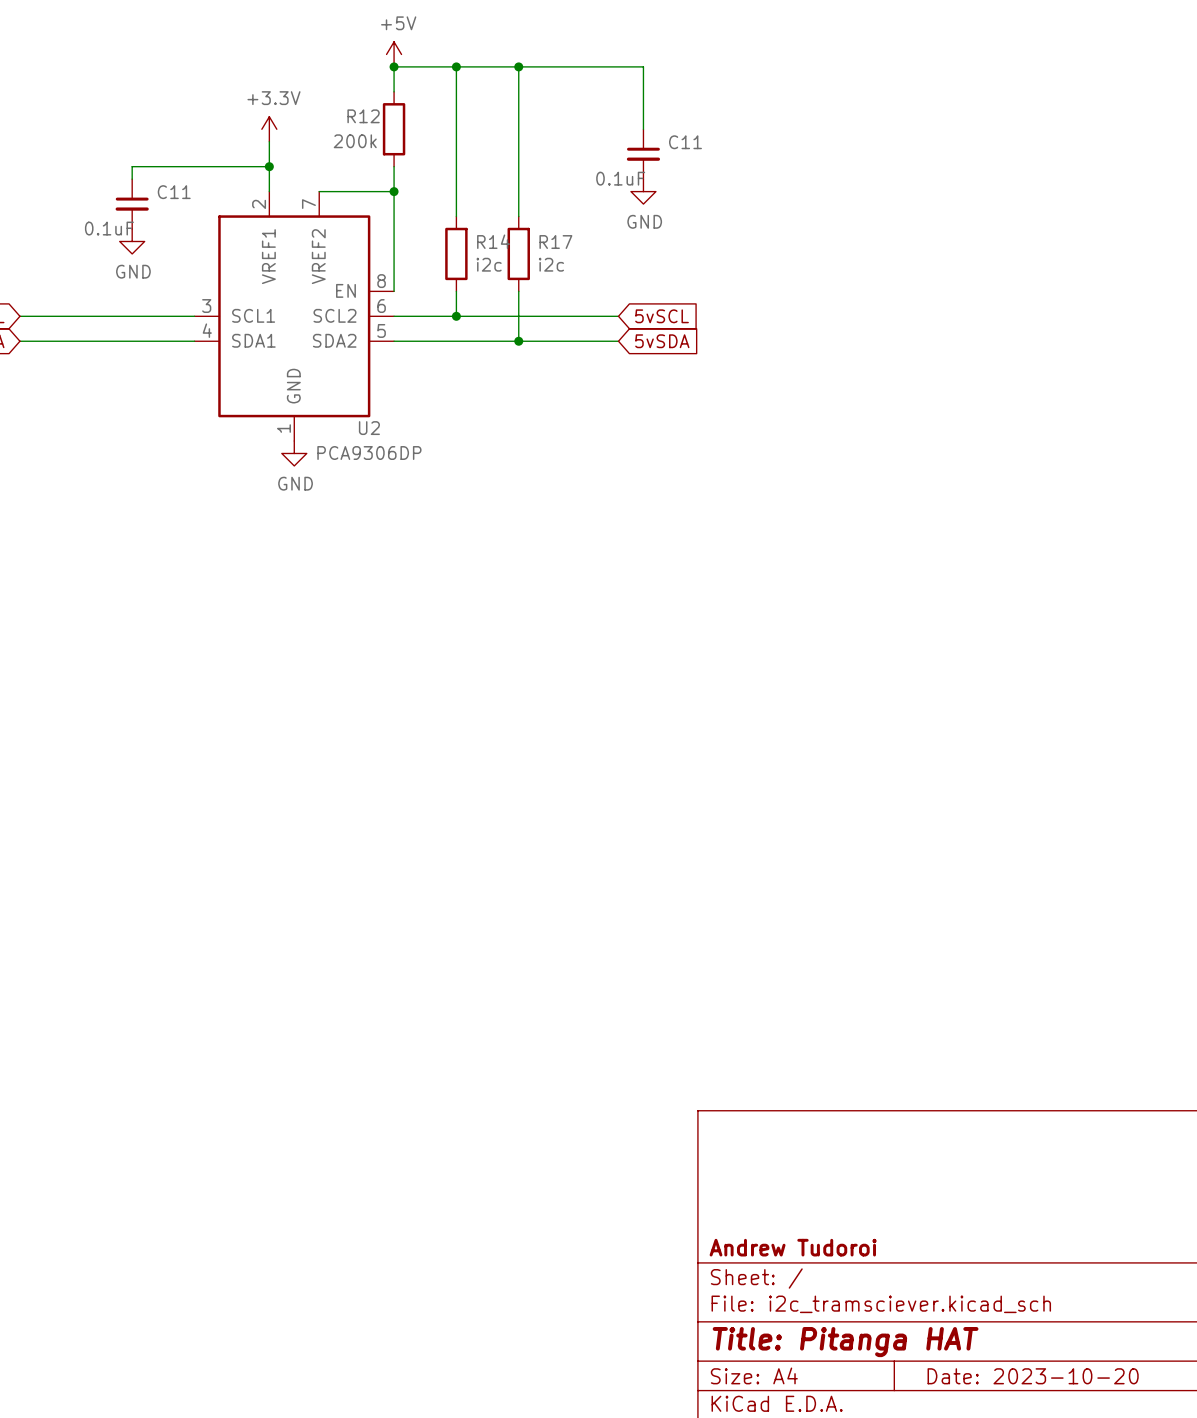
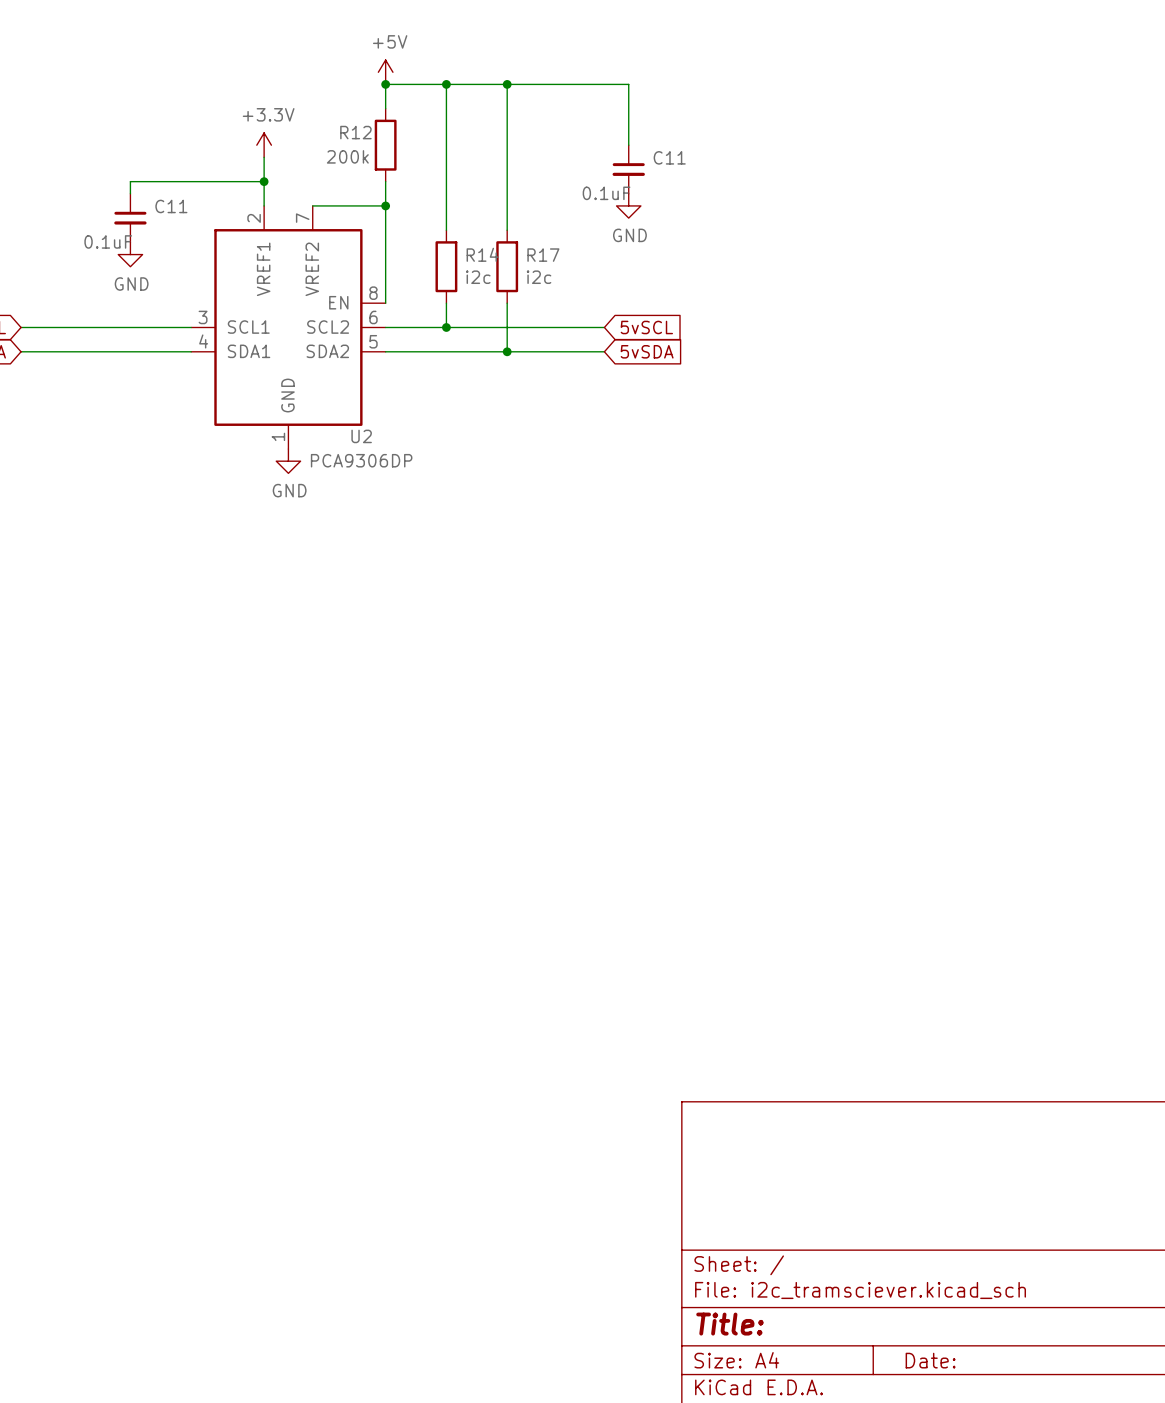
title block: Andrew Tudoroi (793, 1247) -> none
title block: Title: Pitanga HAT (845, 1342) -> Title: (729, 1324)
title block: Date: 2023-10-20 (1033, 1376) -> Date: (930, 1360)

